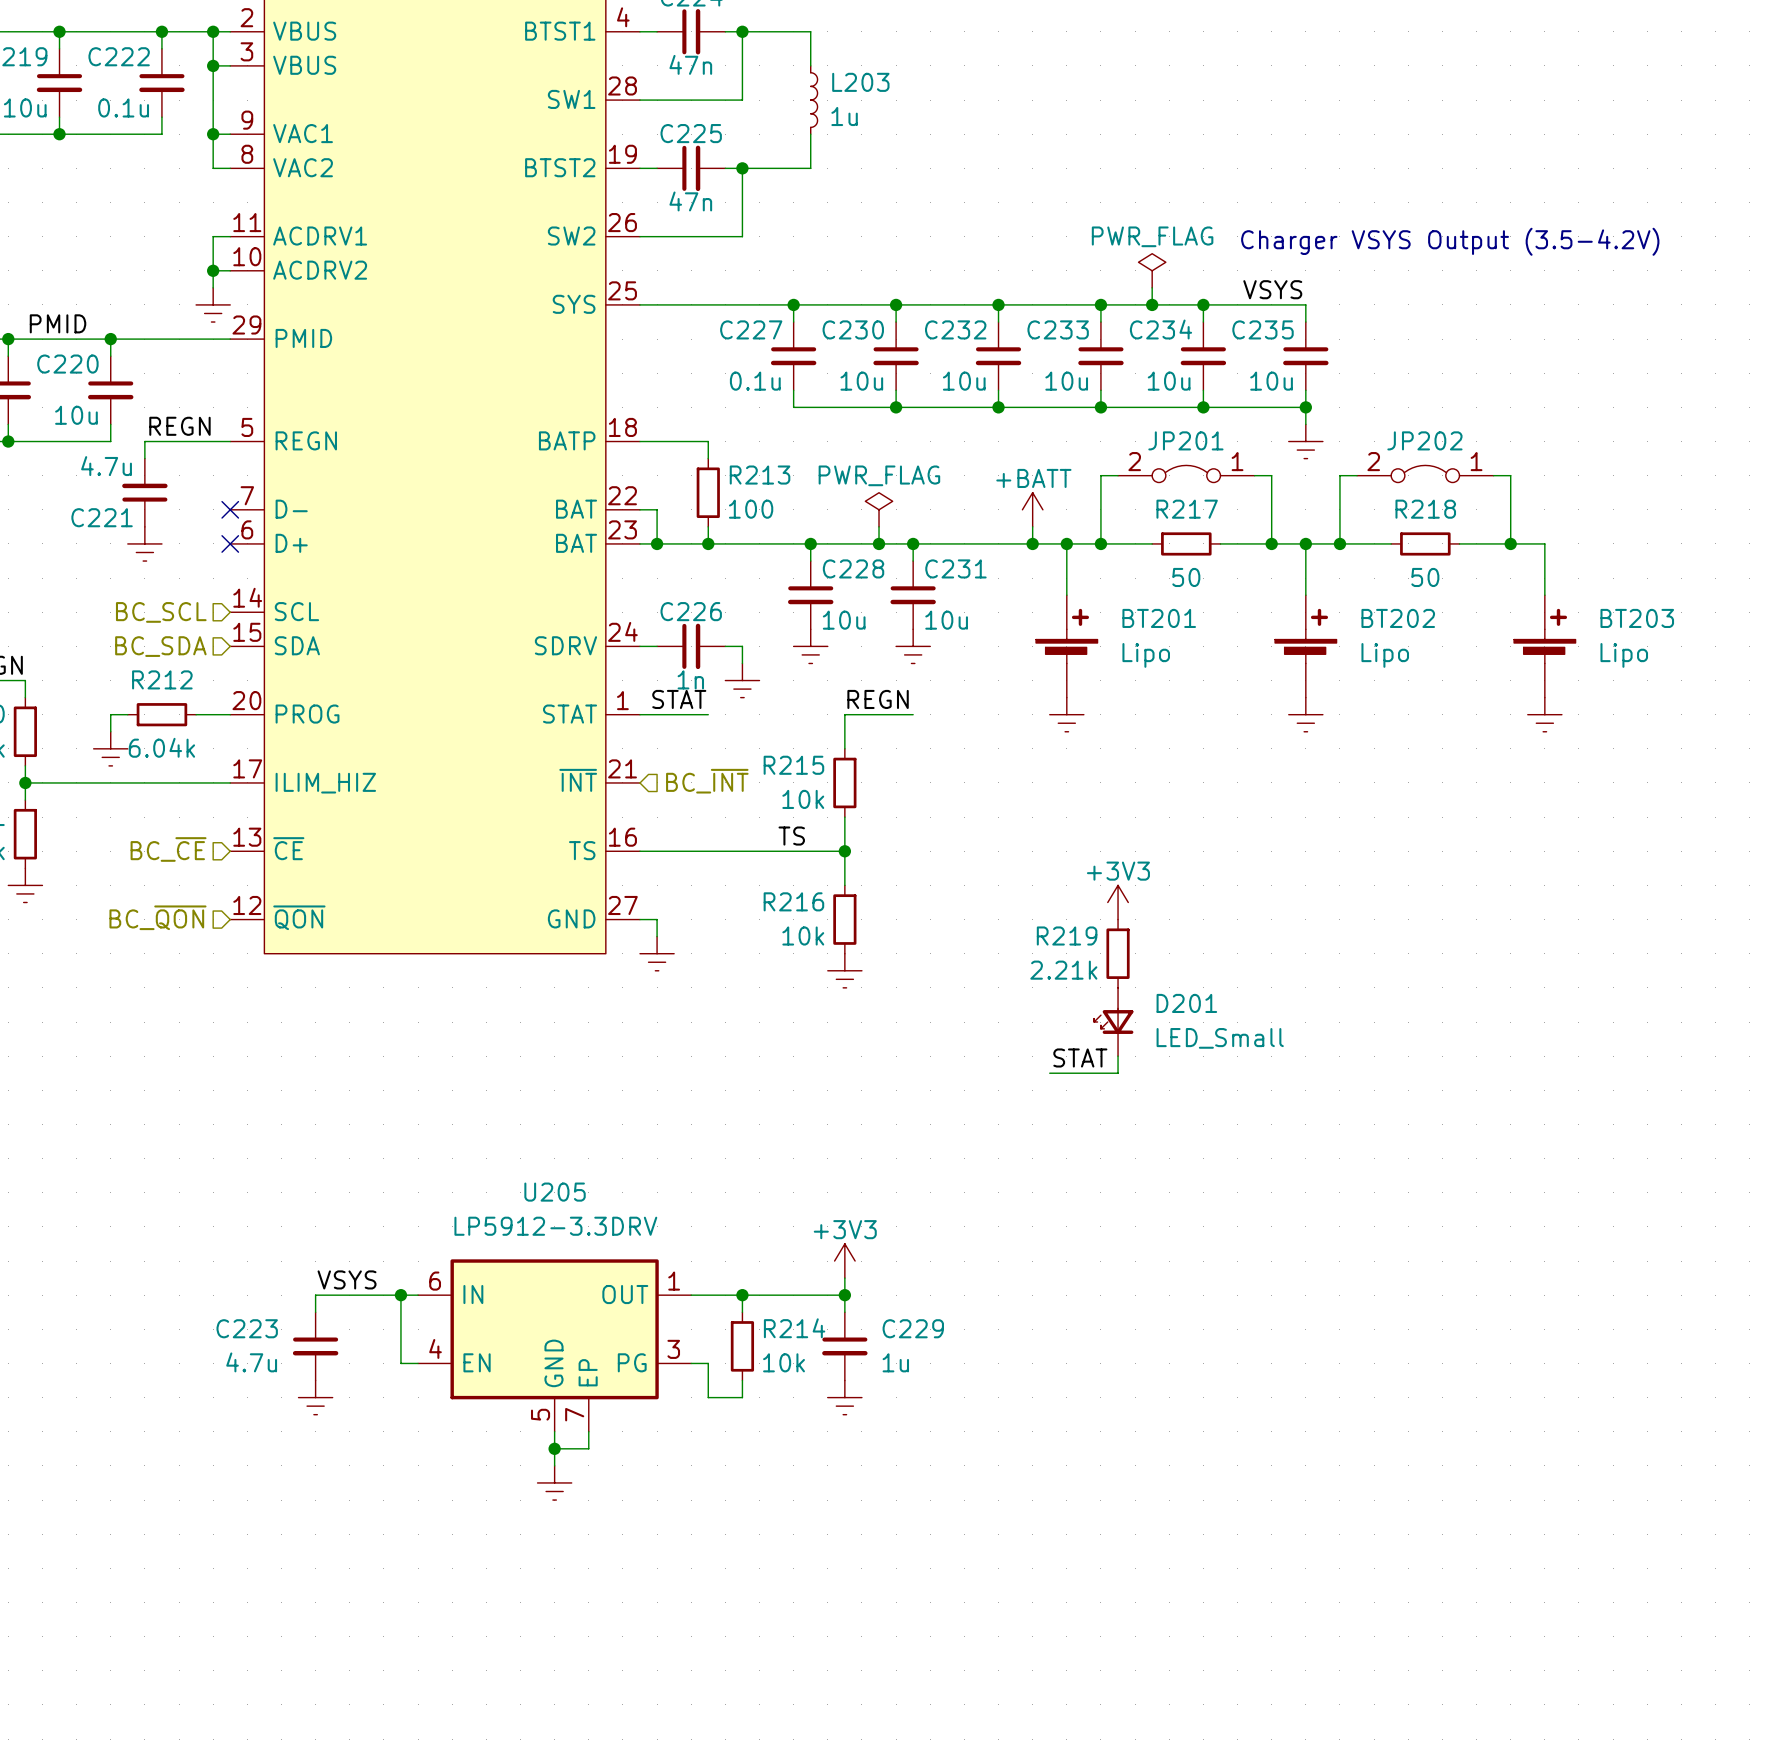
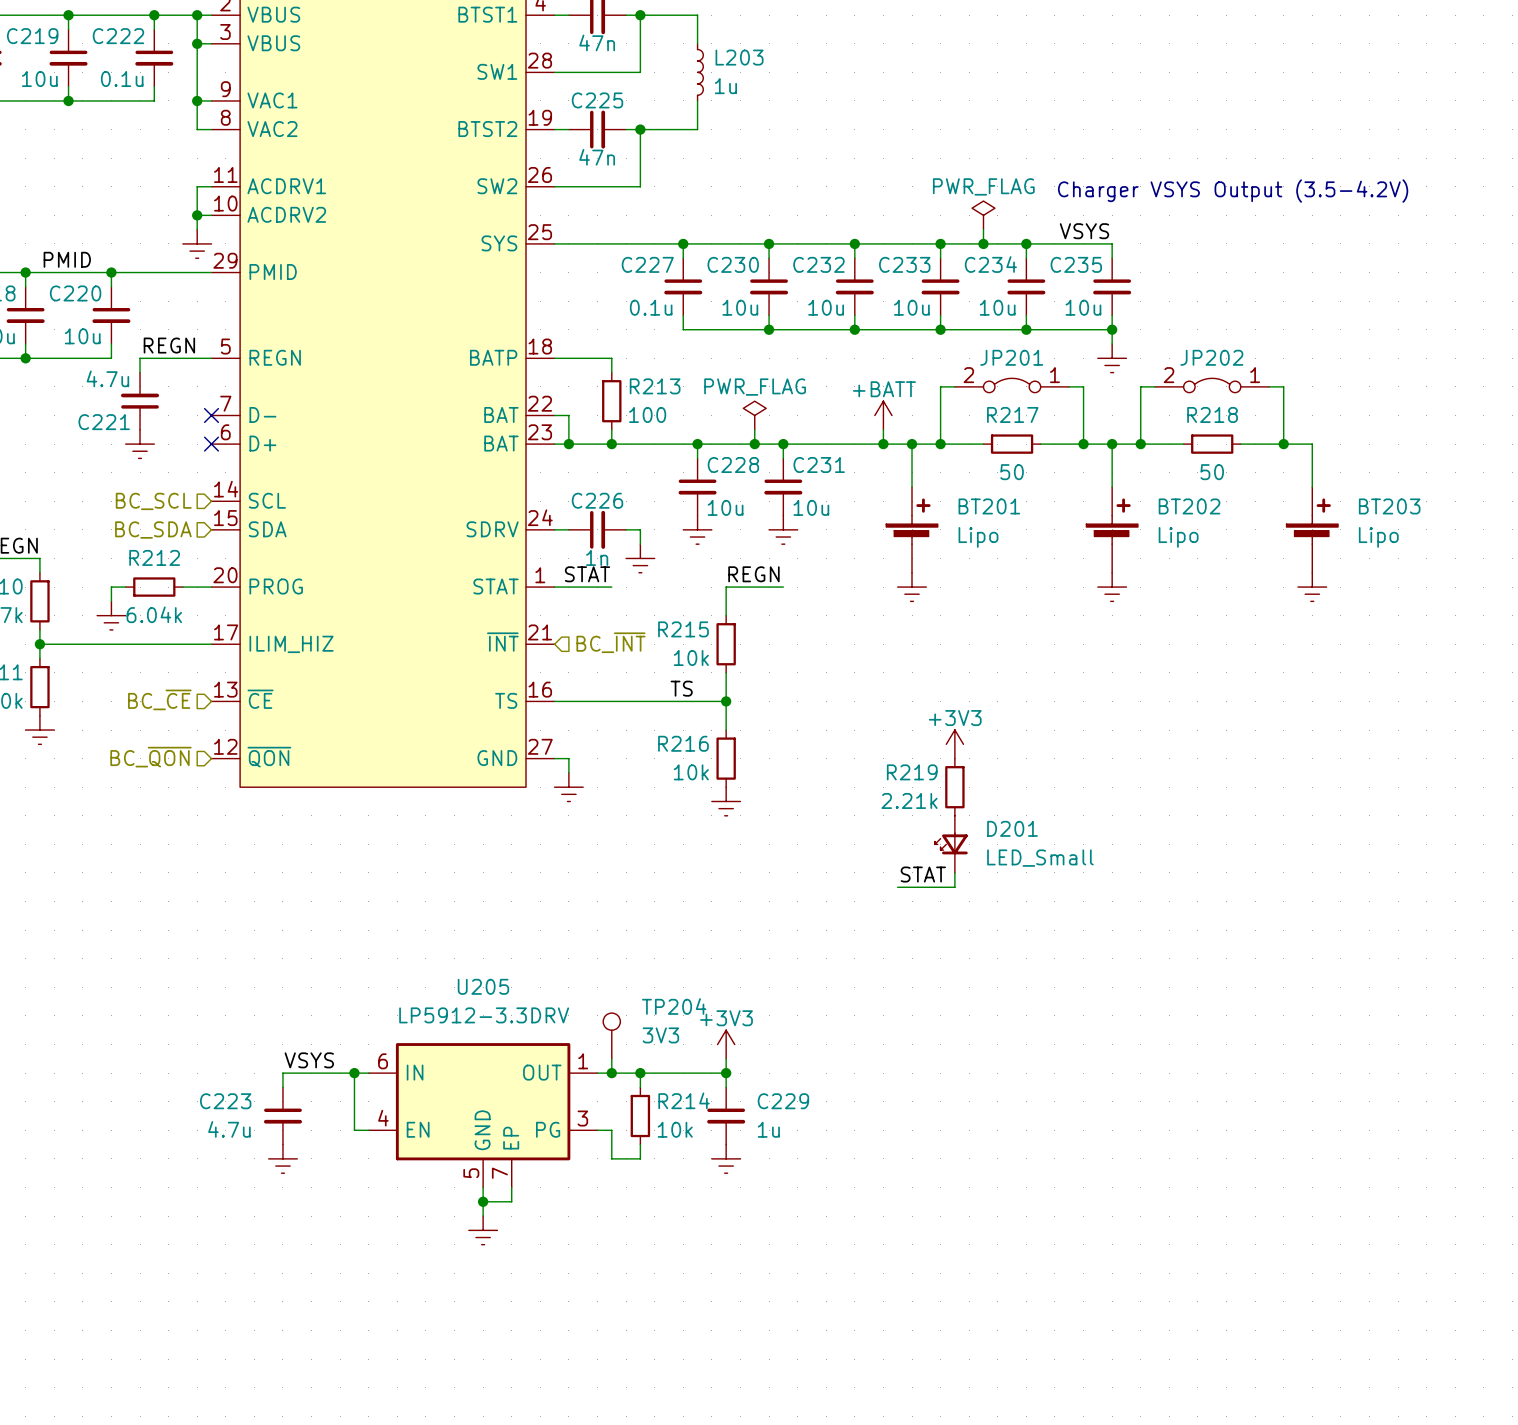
TP204: none -> 3V3 (611, 1035)
wire: none -> (611, 1058) (611, 1073)
junction: none -> (611, 1073)

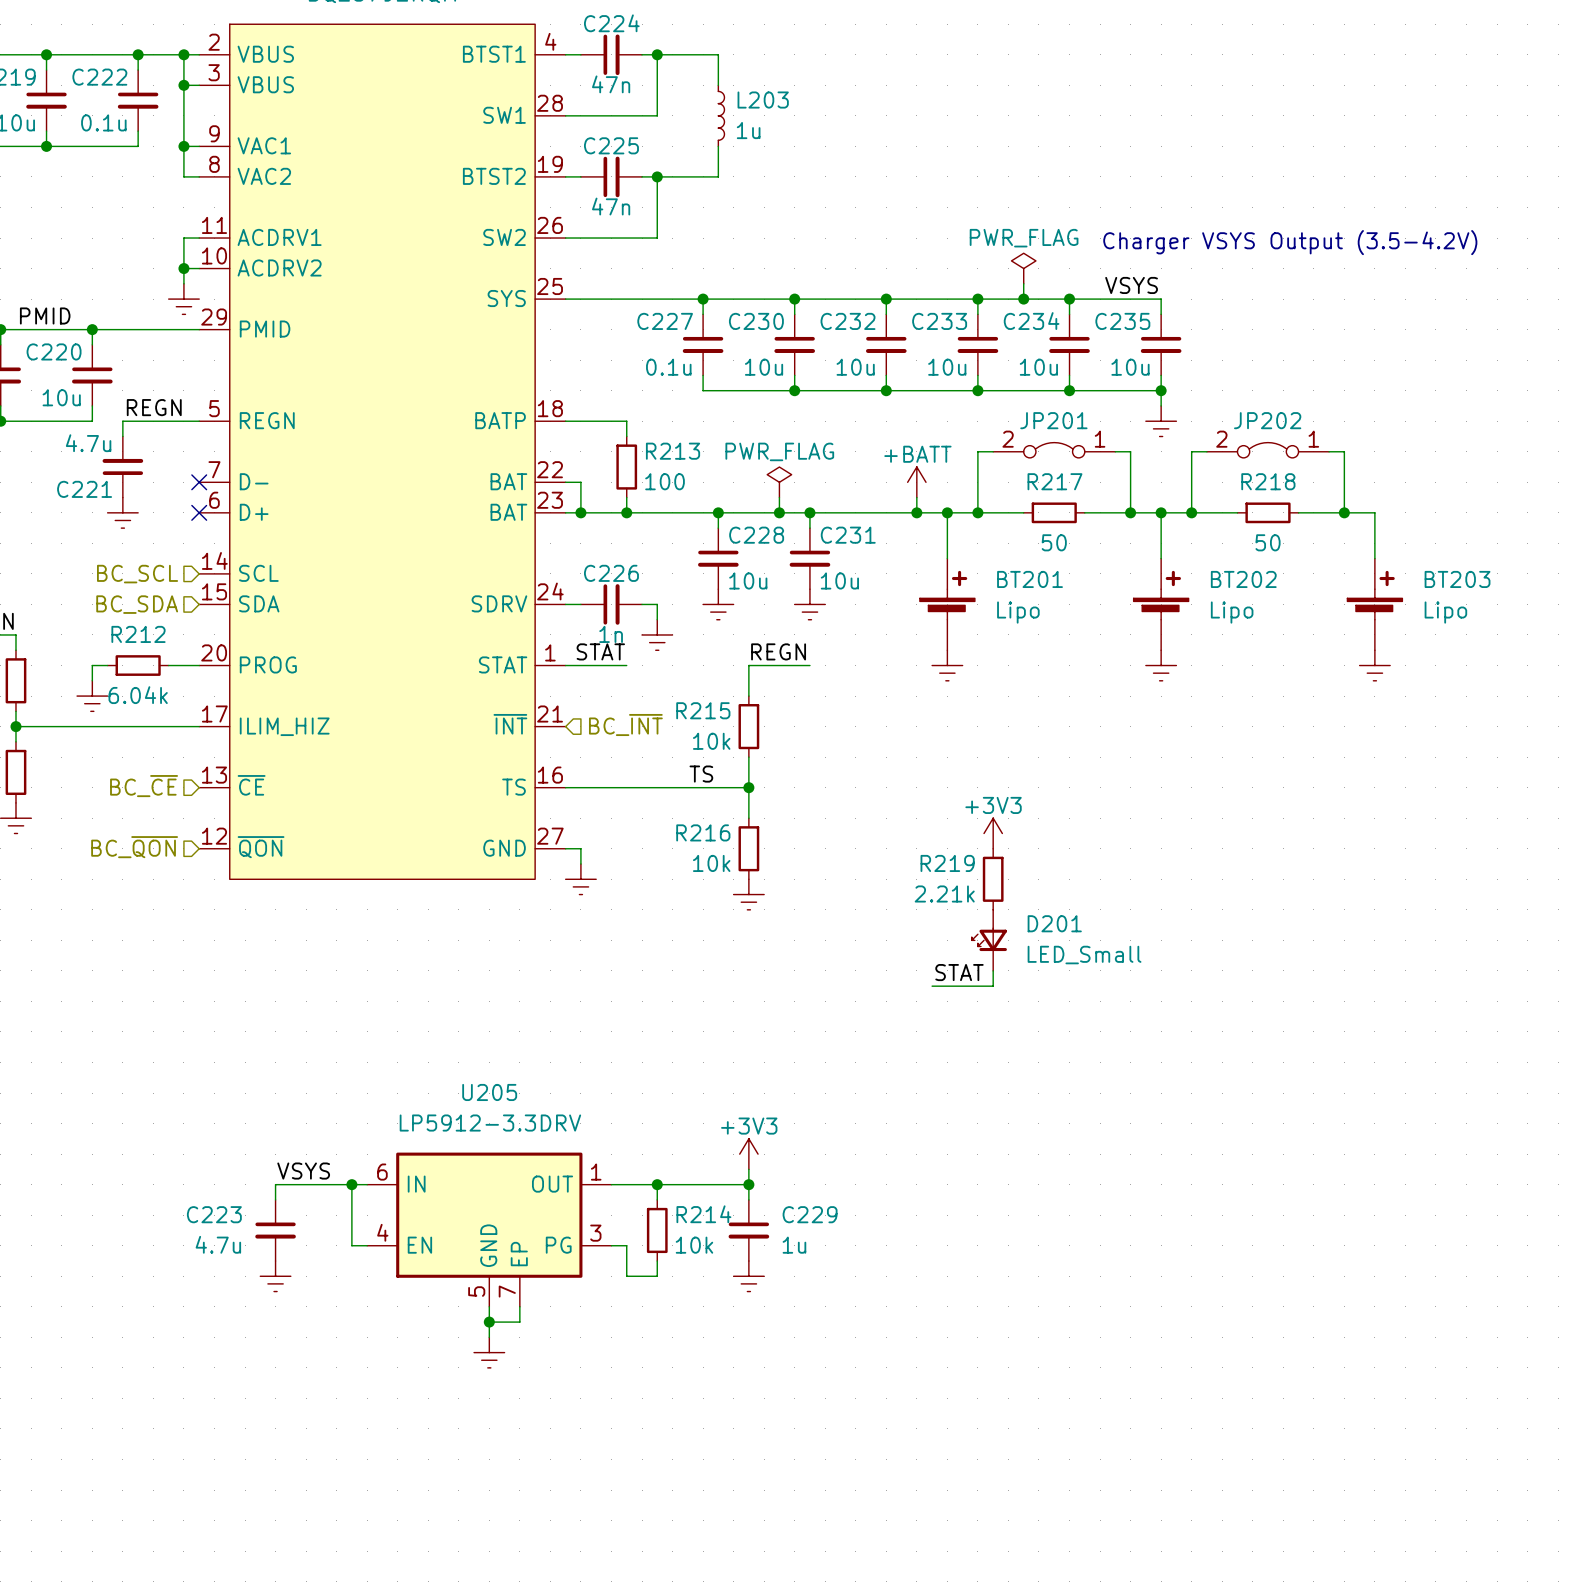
TP204: 3V3 (611, 1035) -> none
wire: (611, 1058) (611, 1073) -> none
junction: (611, 1073) -> none

